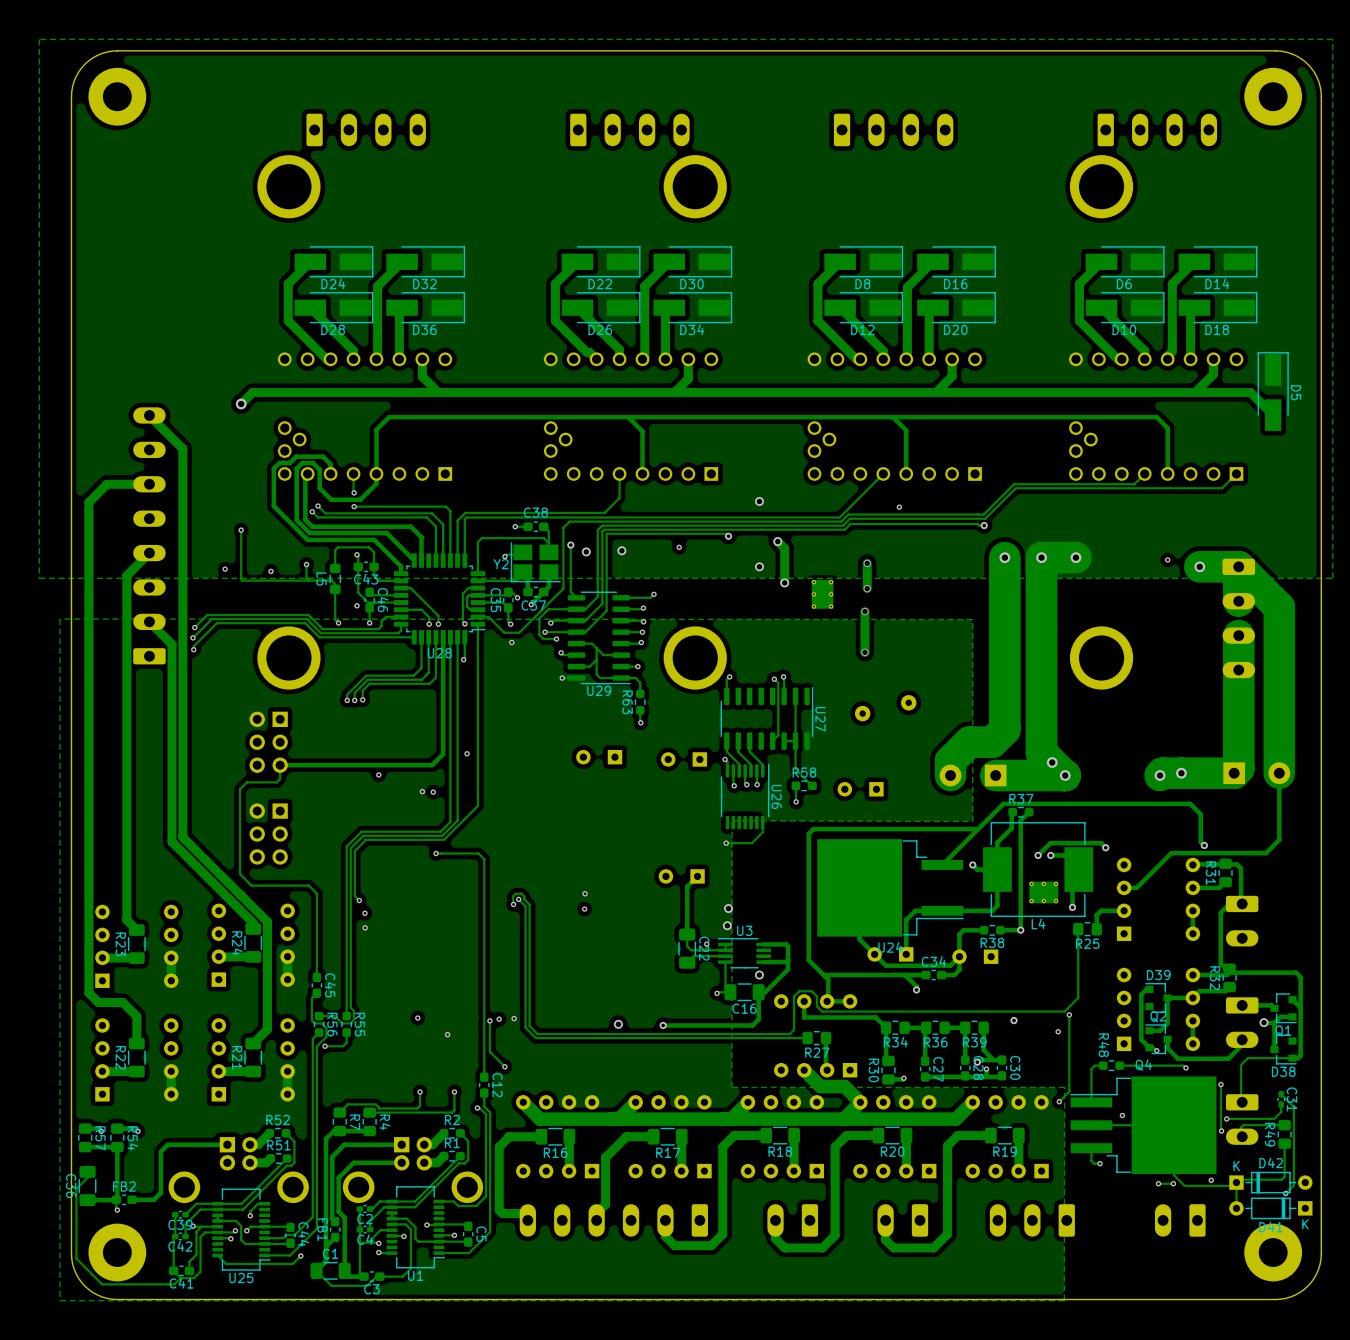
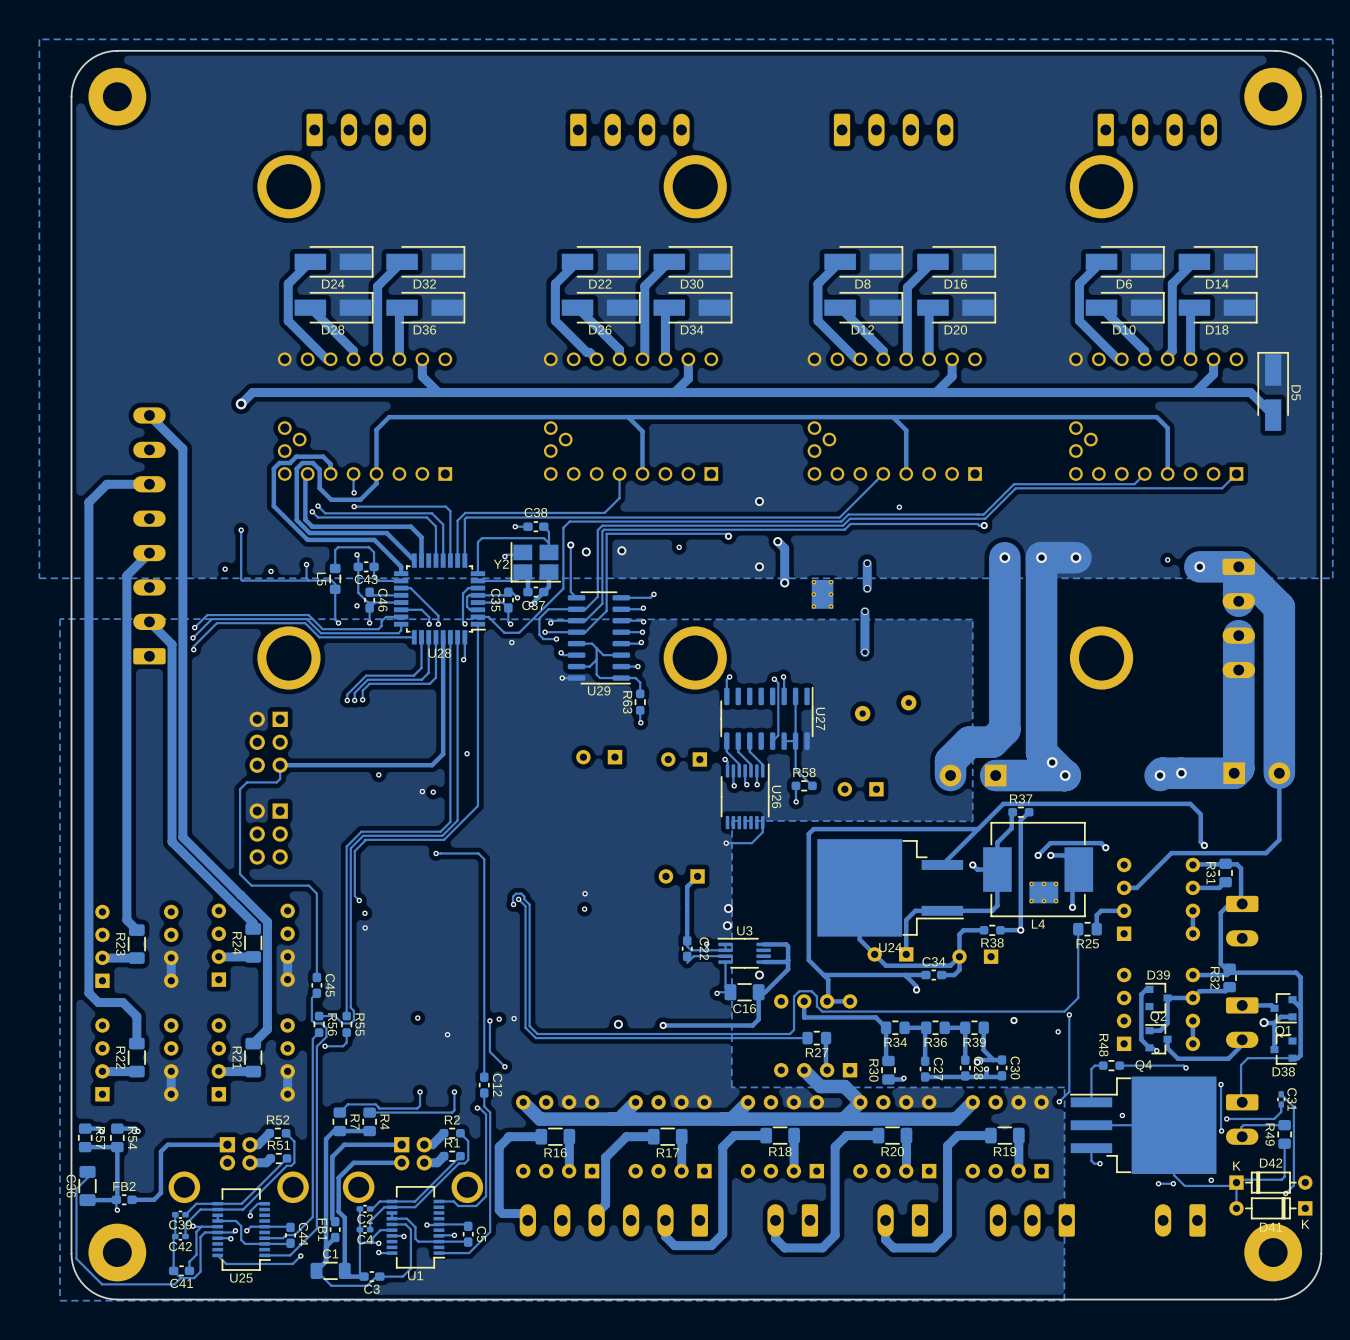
C22 footprint: [678, 928, 696, 969] -> [682, 936, 693, 962]

